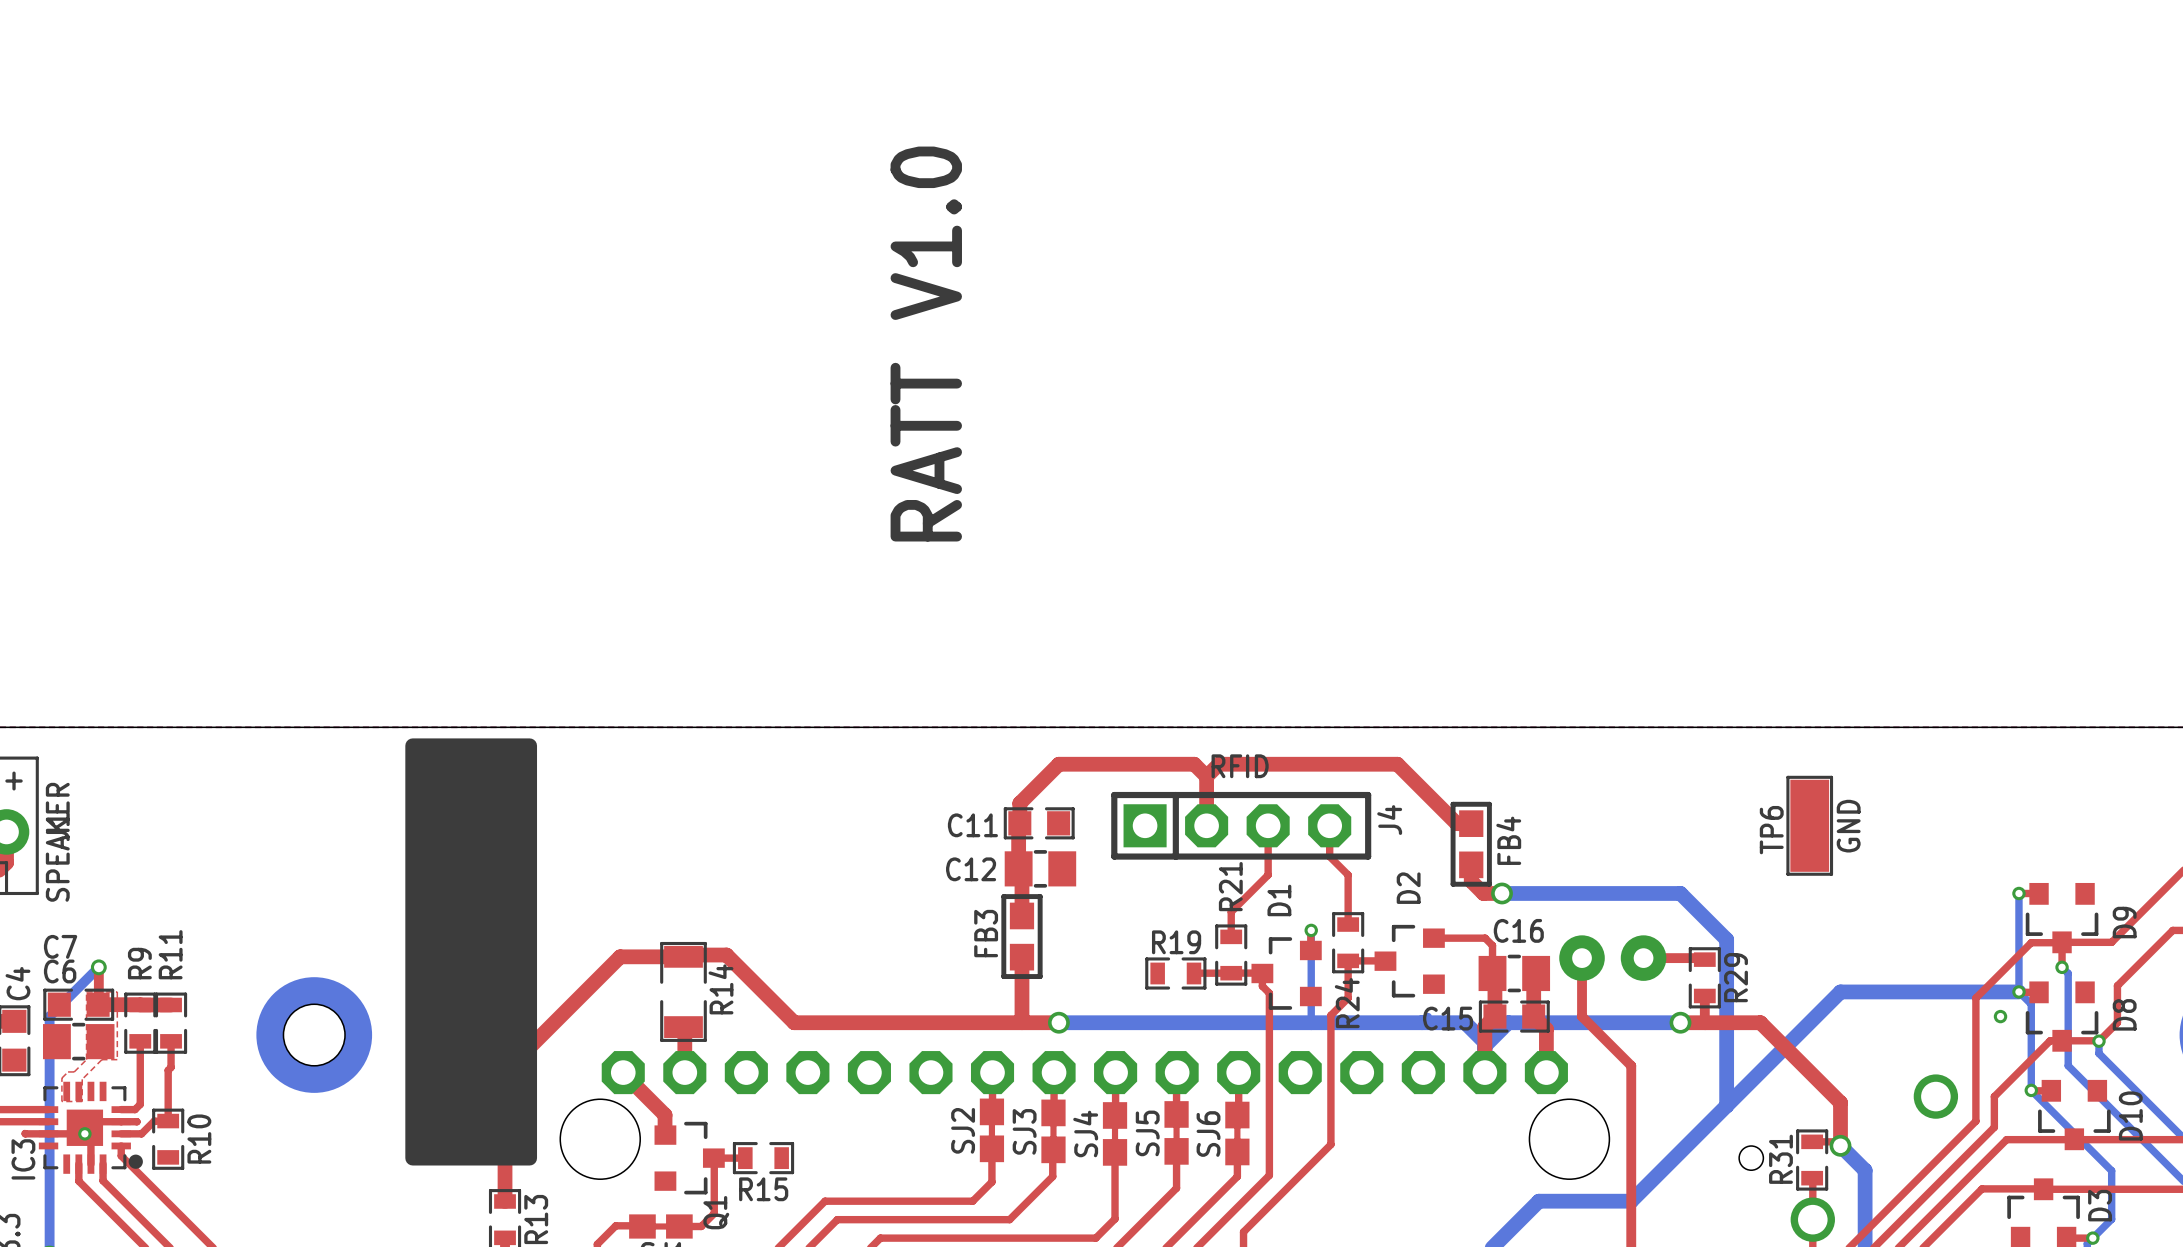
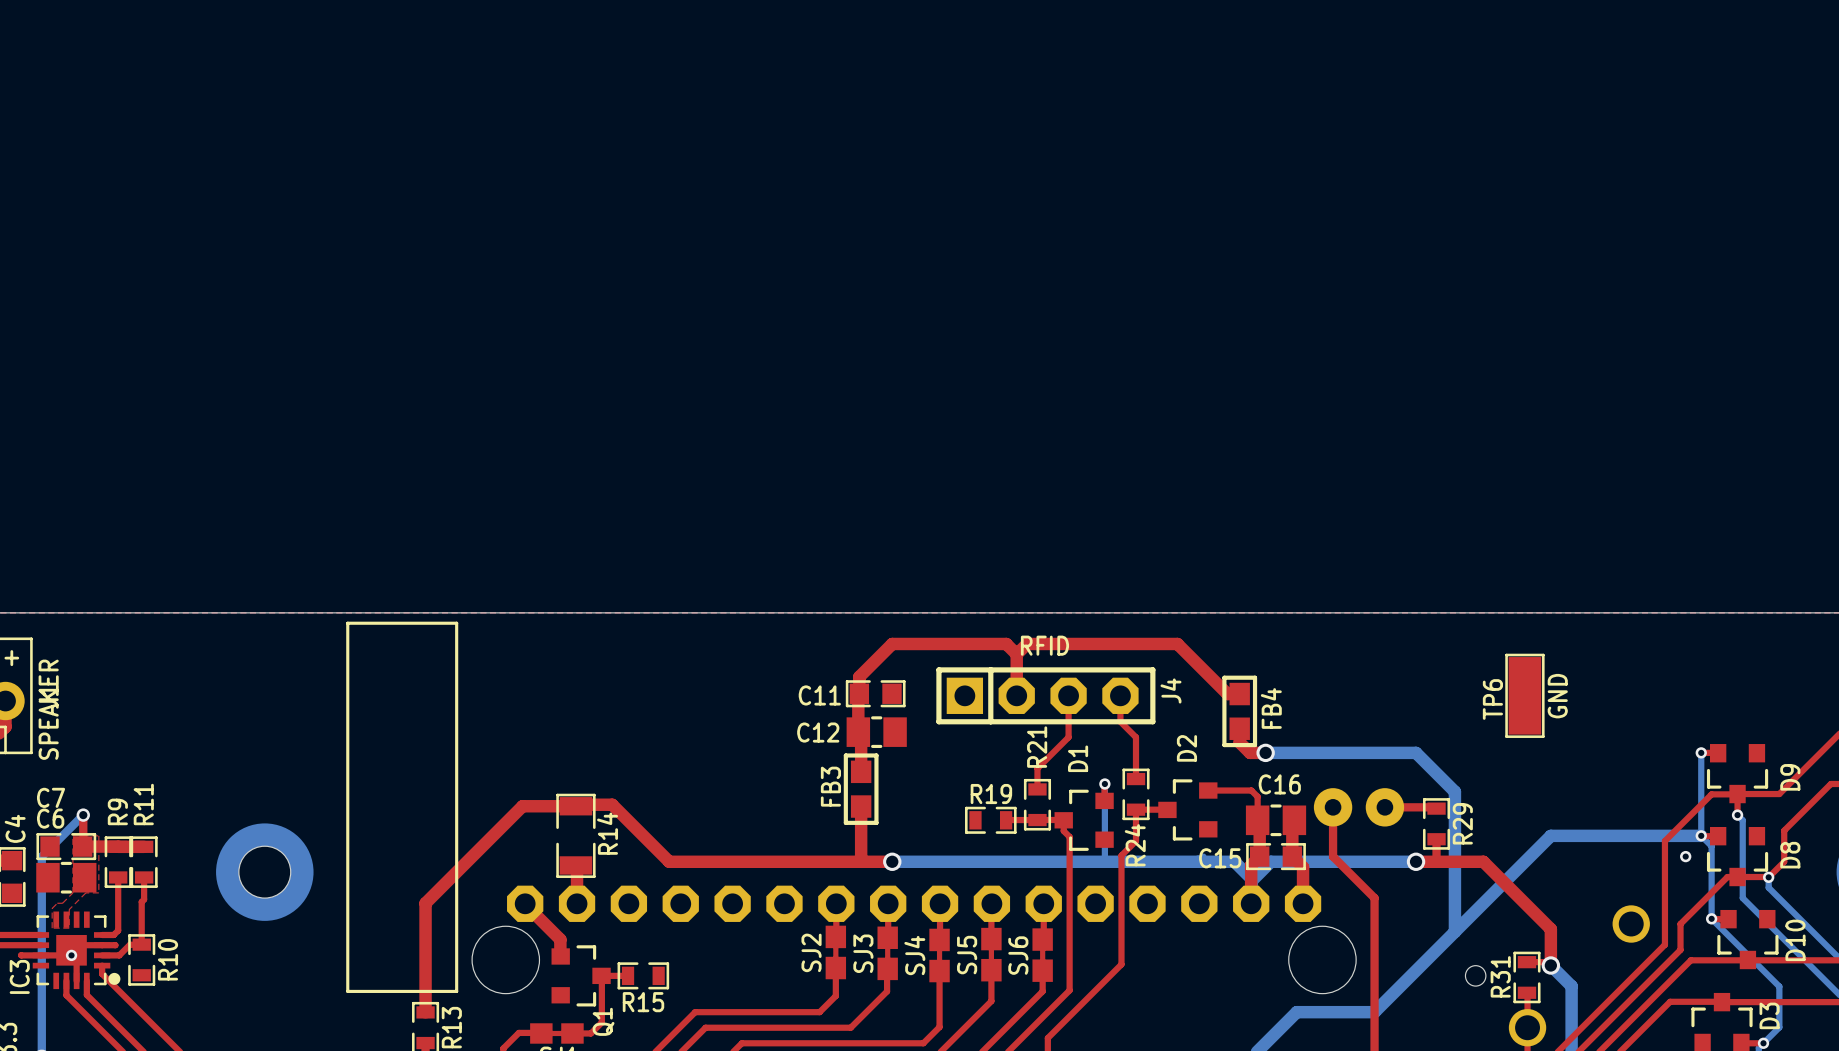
text: RATT V1.0 (926, 344) -> none
drawing: [405, 738, 538, 1166] -> none
line: none -> (347, 623) (347, 991) (456, 991) (456, 623) (347, 623)

